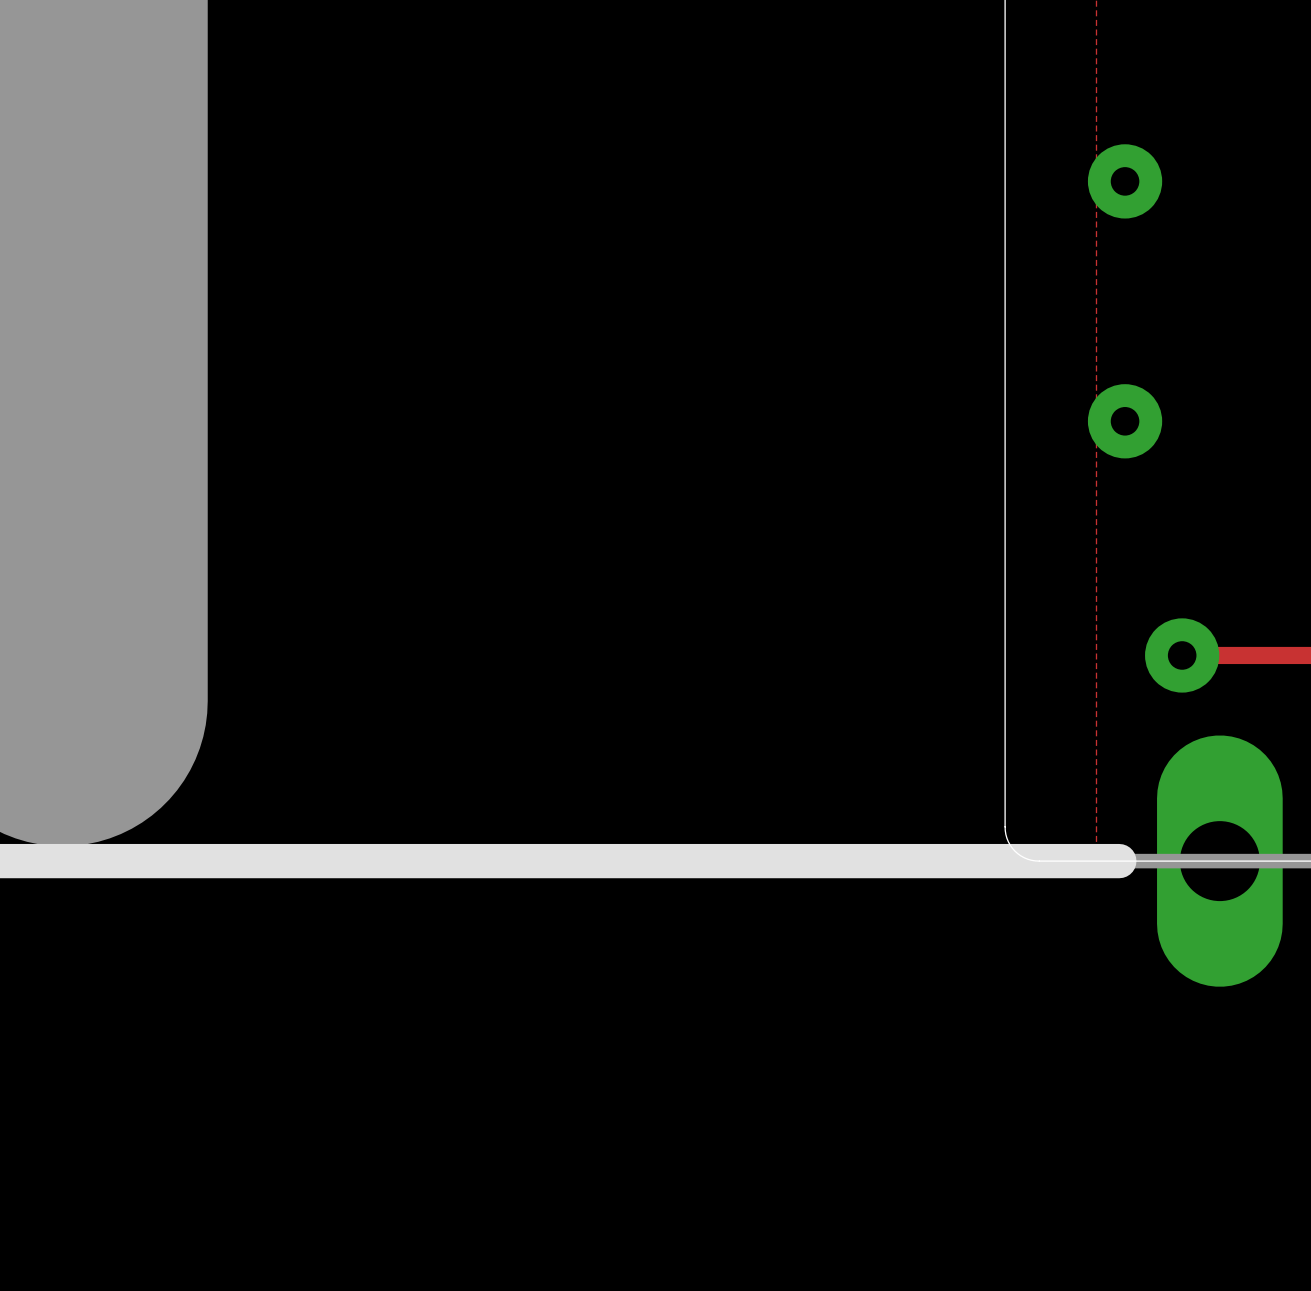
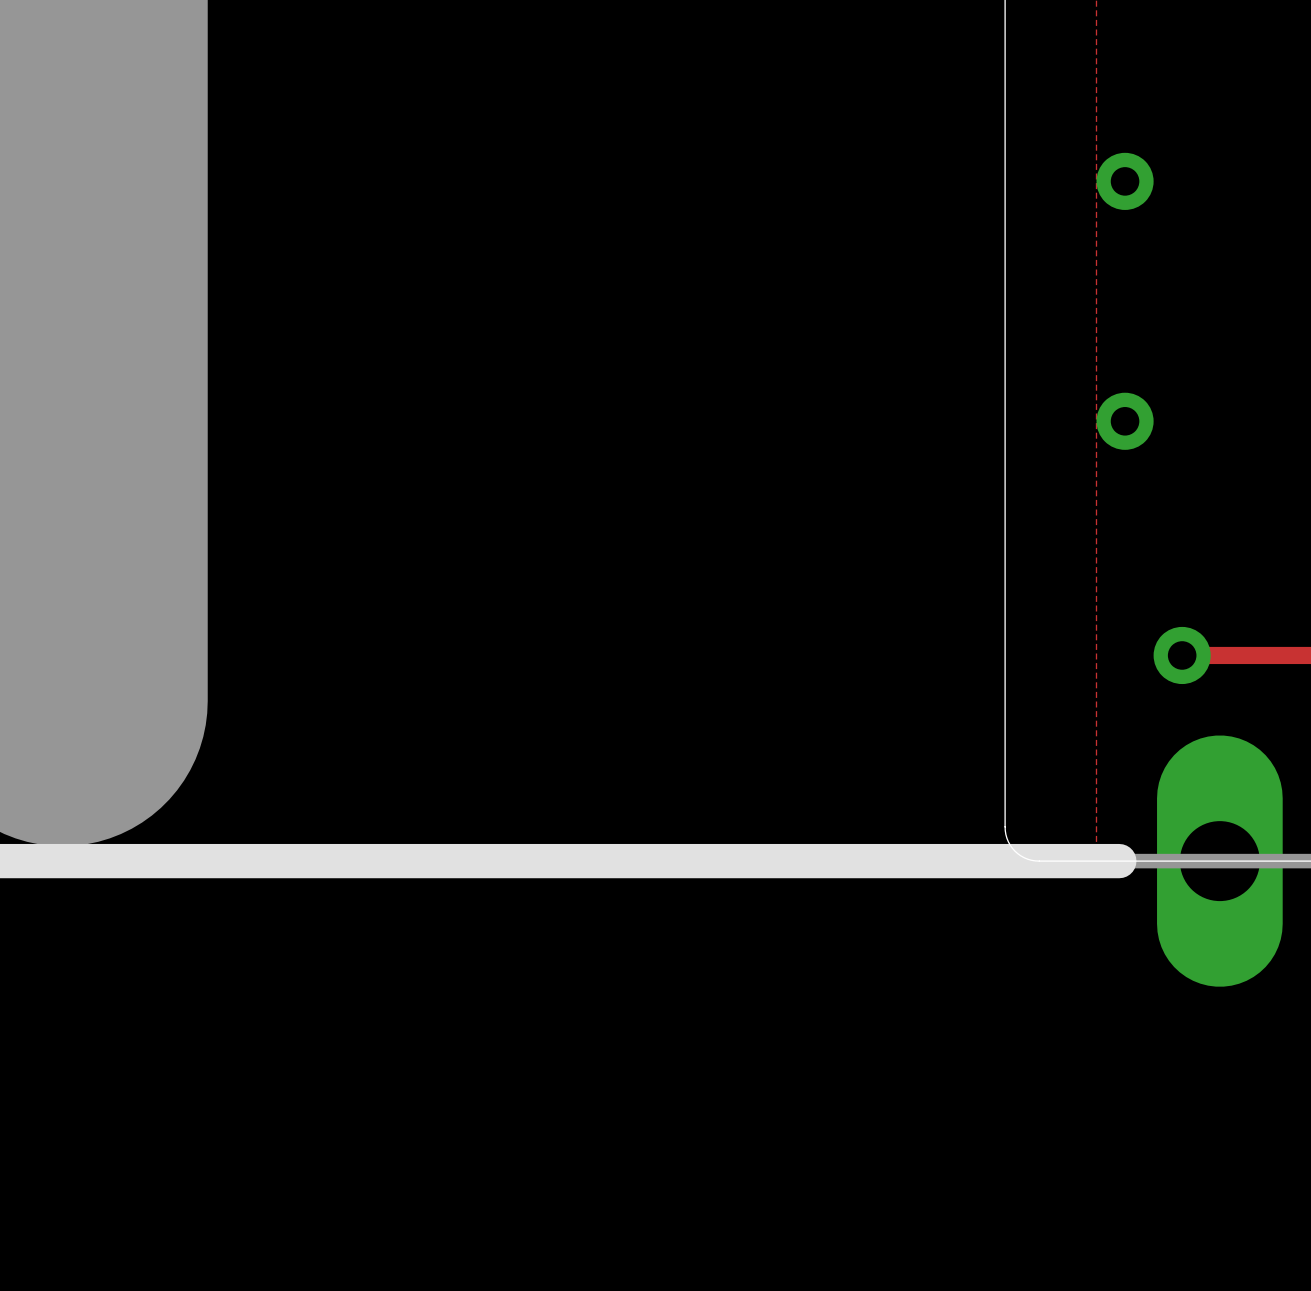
via size: [1087, 144, 1163, 219] -> [1096, 152, 1154, 210]
via size: [1087, 384, 1163, 459] -> [1096, 392, 1154, 450]
via size: [1145, 618, 1220, 693] -> [1153, 626, 1211, 685]

